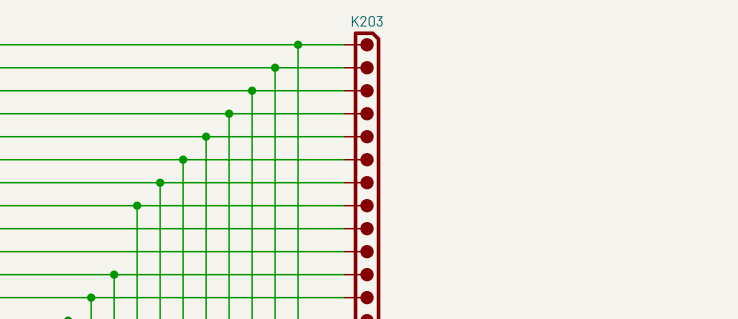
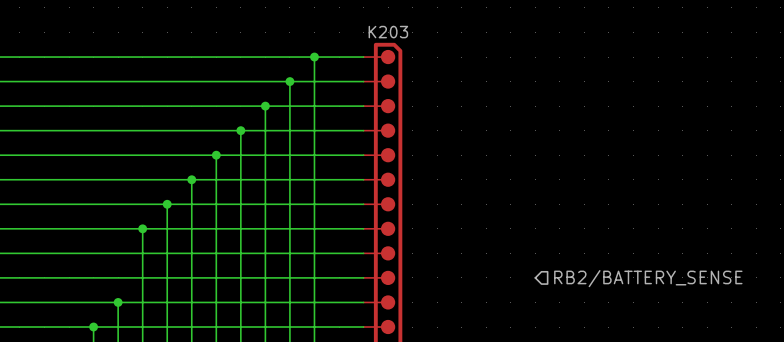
hierarchical label: none -> RB2/BATTERY_SENSE (648, 278)

